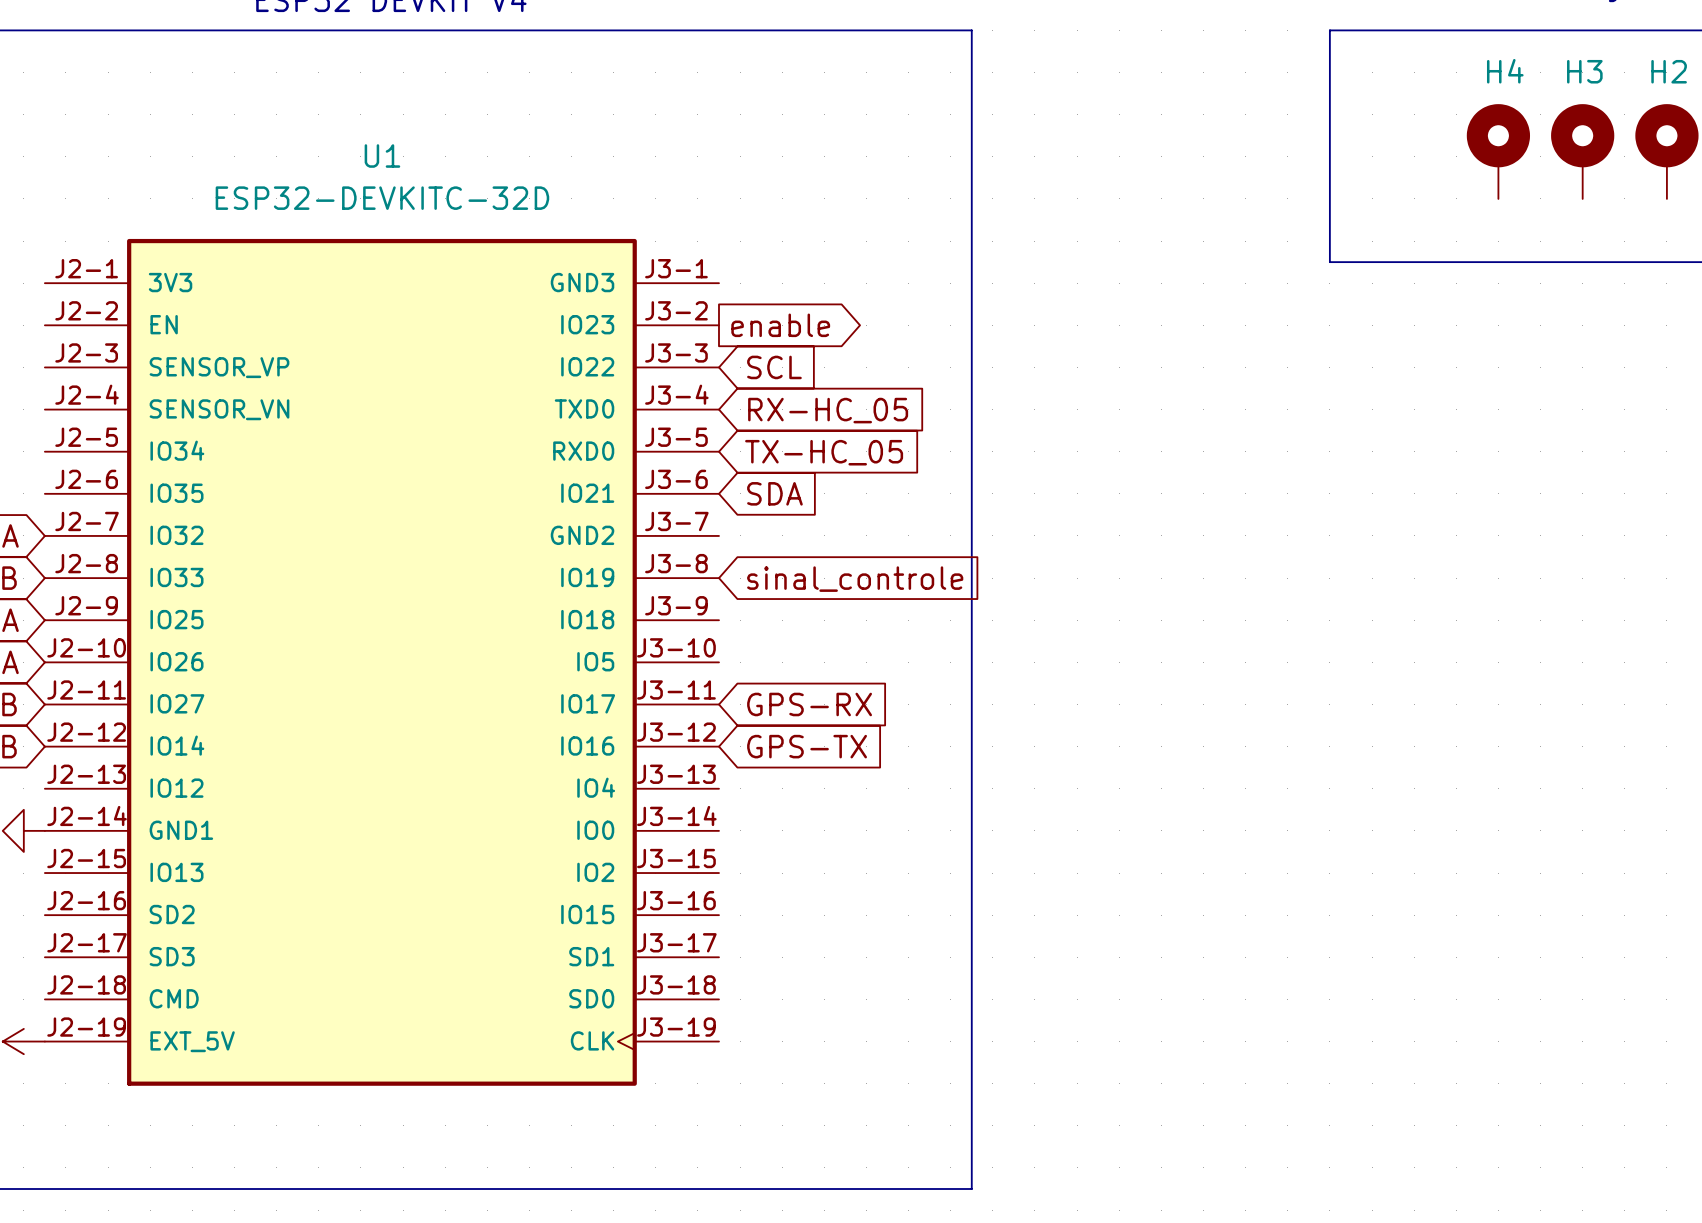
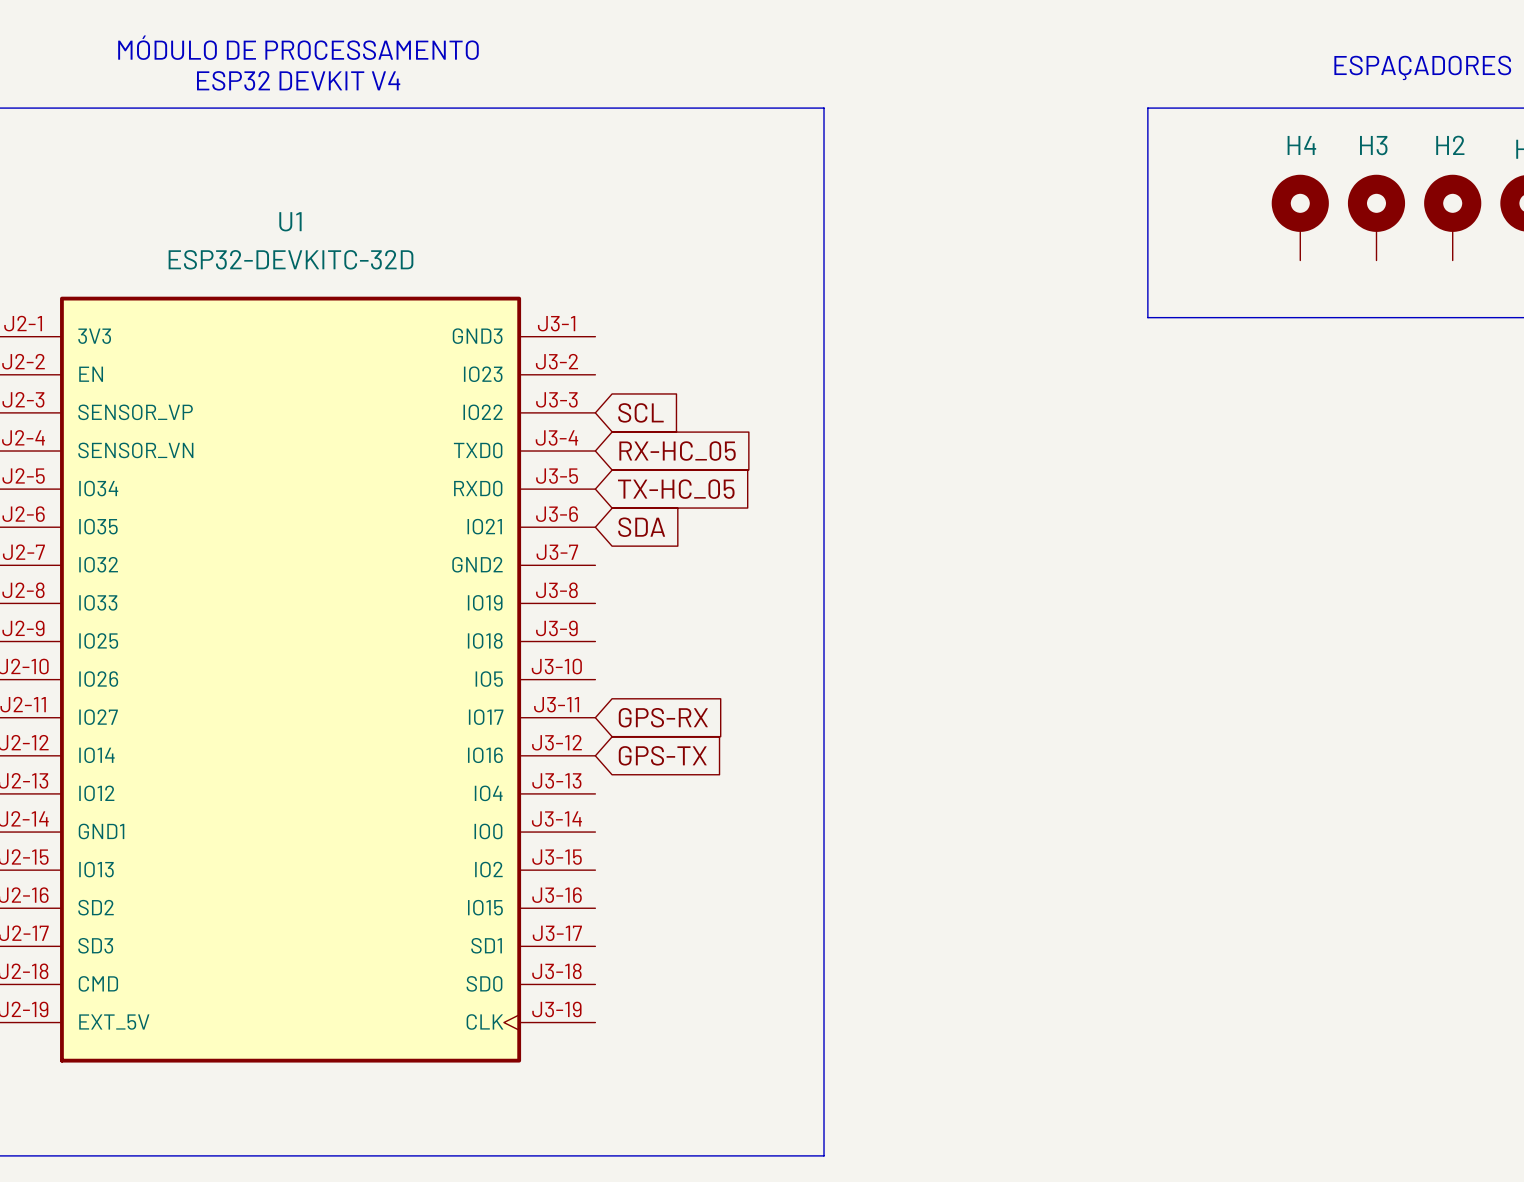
global label: enable (780, 325) -> none
global label: sinal_controle (855, 579) -> none

